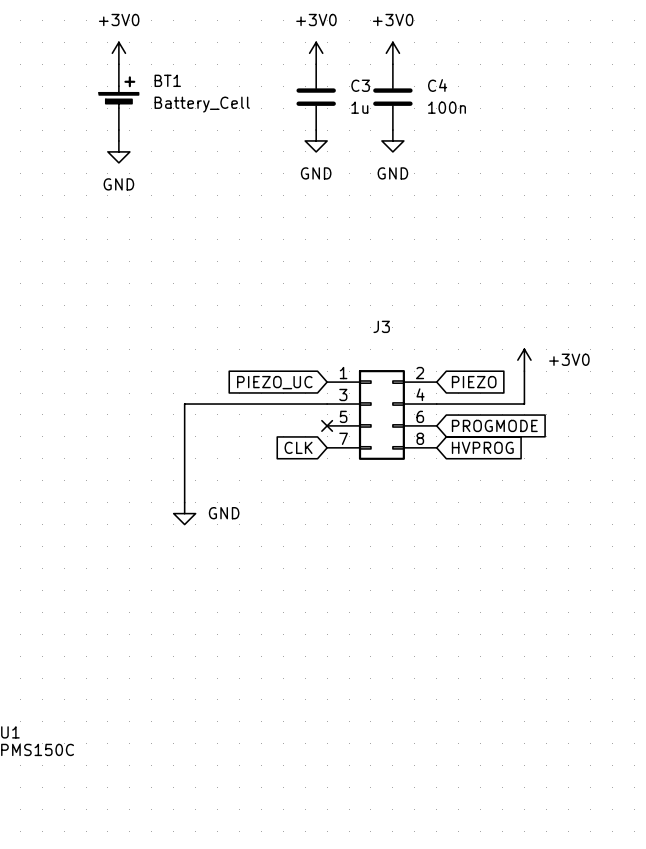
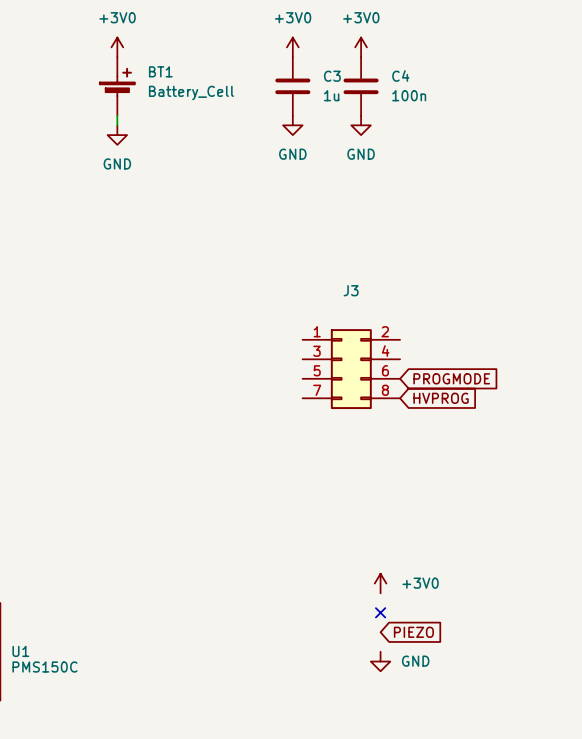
power symbol: +3V0 (524, 360) -> none
wire: (524, 371) (524, 404) (436, 404) -> none
global label: PIEZO_UC (274, 382) -> none
global label: PIEZO (474, 382) -> none
wire: (327, 404) (184, 404) (184, 502) -> none
no-connect mark: (327, 425) -> none
global label: CLK (298, 447) -> none
power symbol: GND (184, 513) -> none
power symbol: none -> +3V0 (380, 583)
no-connect mark: none -> (380, 612)
global label: none -> PIEZO (413, 632)
power symbol: none -> GND (380, 661)

